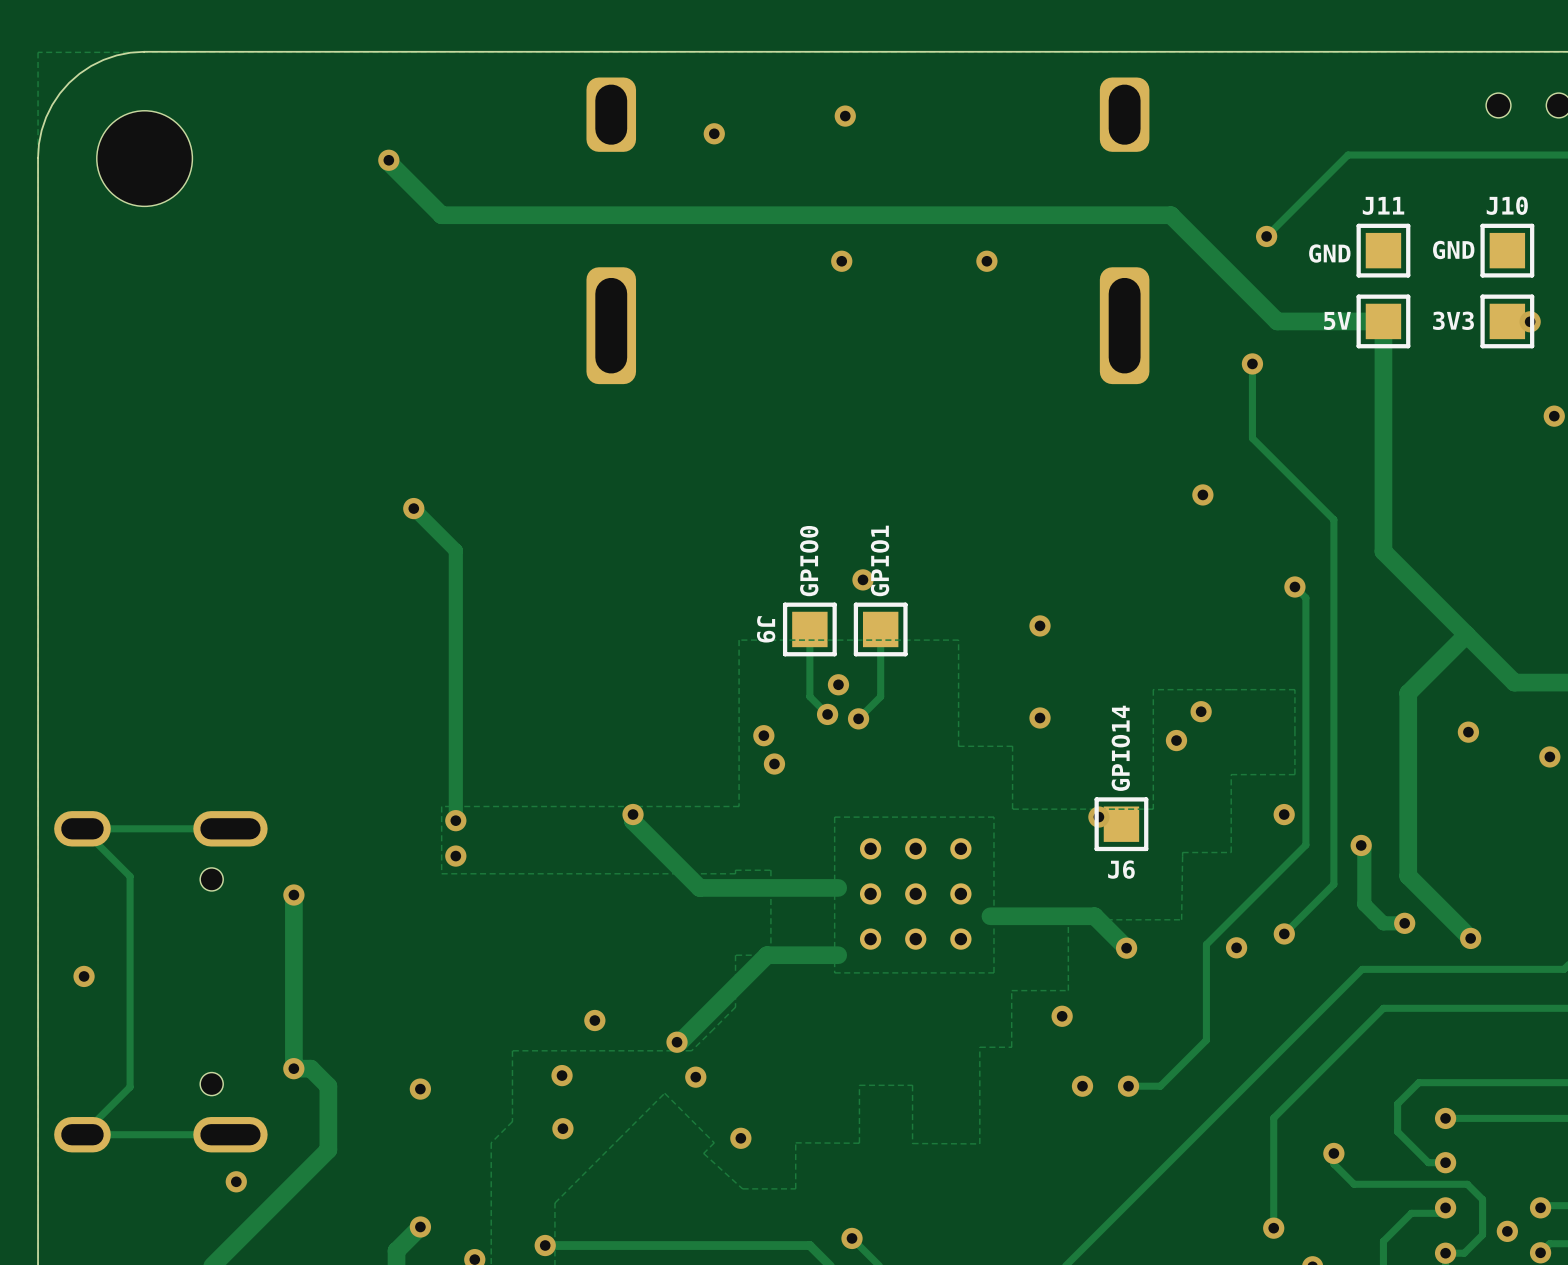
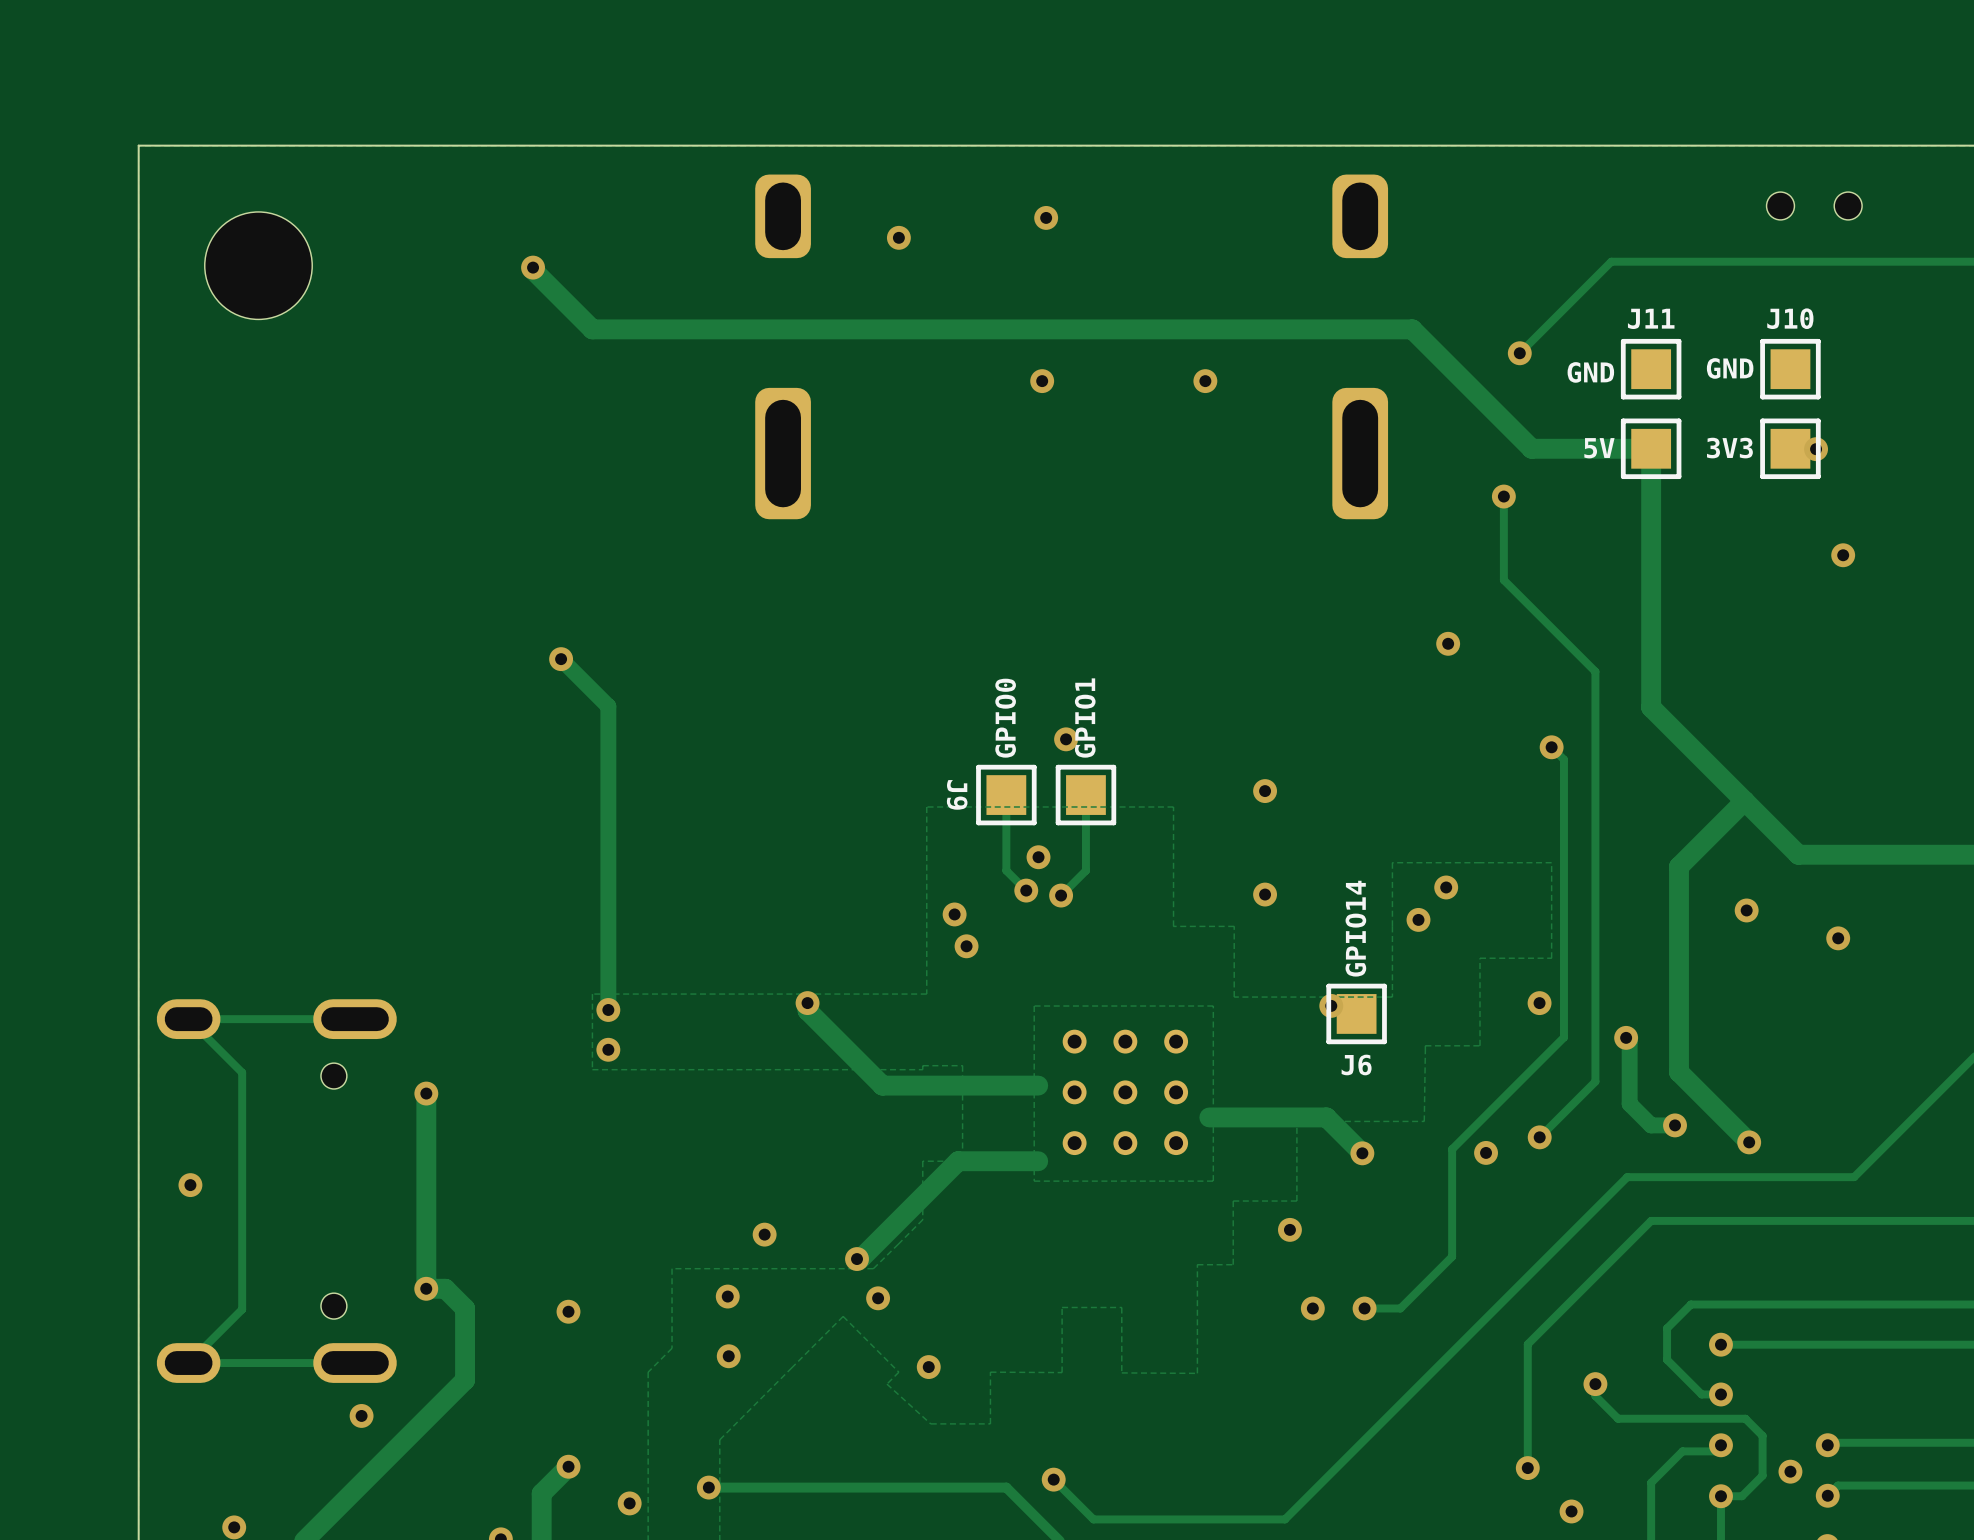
board edge: (144, 51) (116, 55) (103, 59) (91, 66) (69, 82) (59, 93) (46, 117) (38, 144) (38, 158) -> (258, 145) (138, 145) (138, 265)

